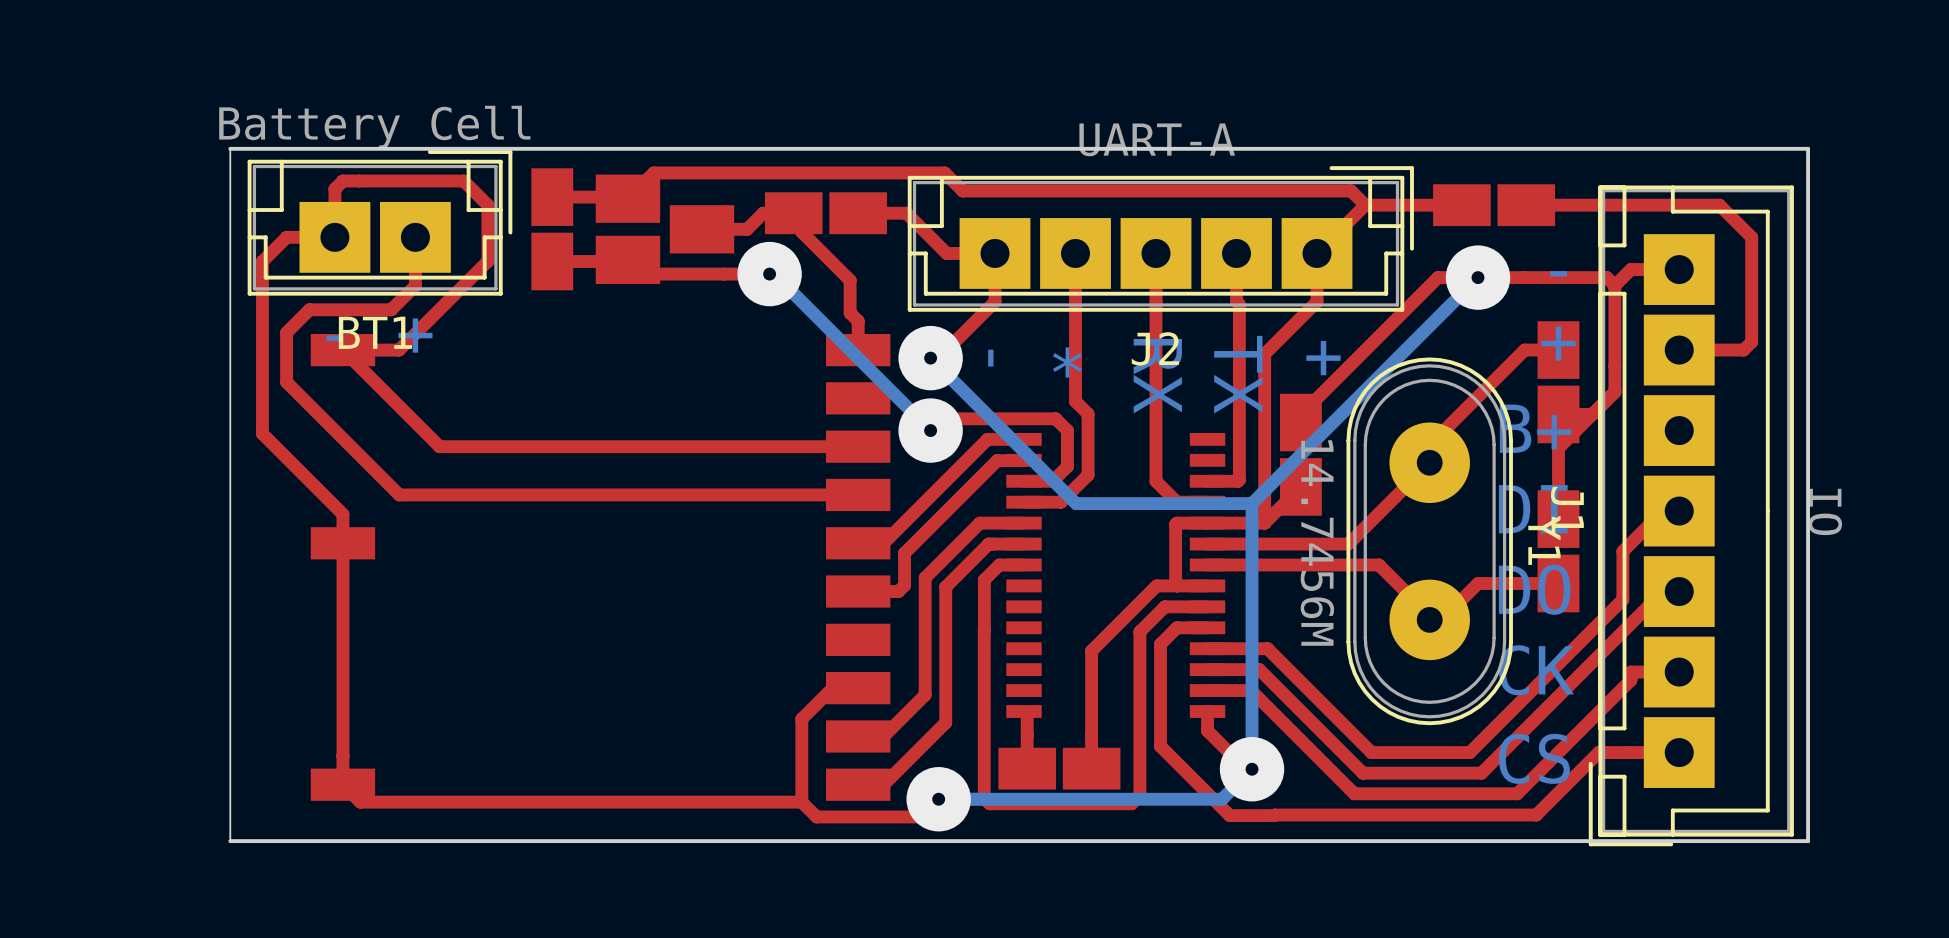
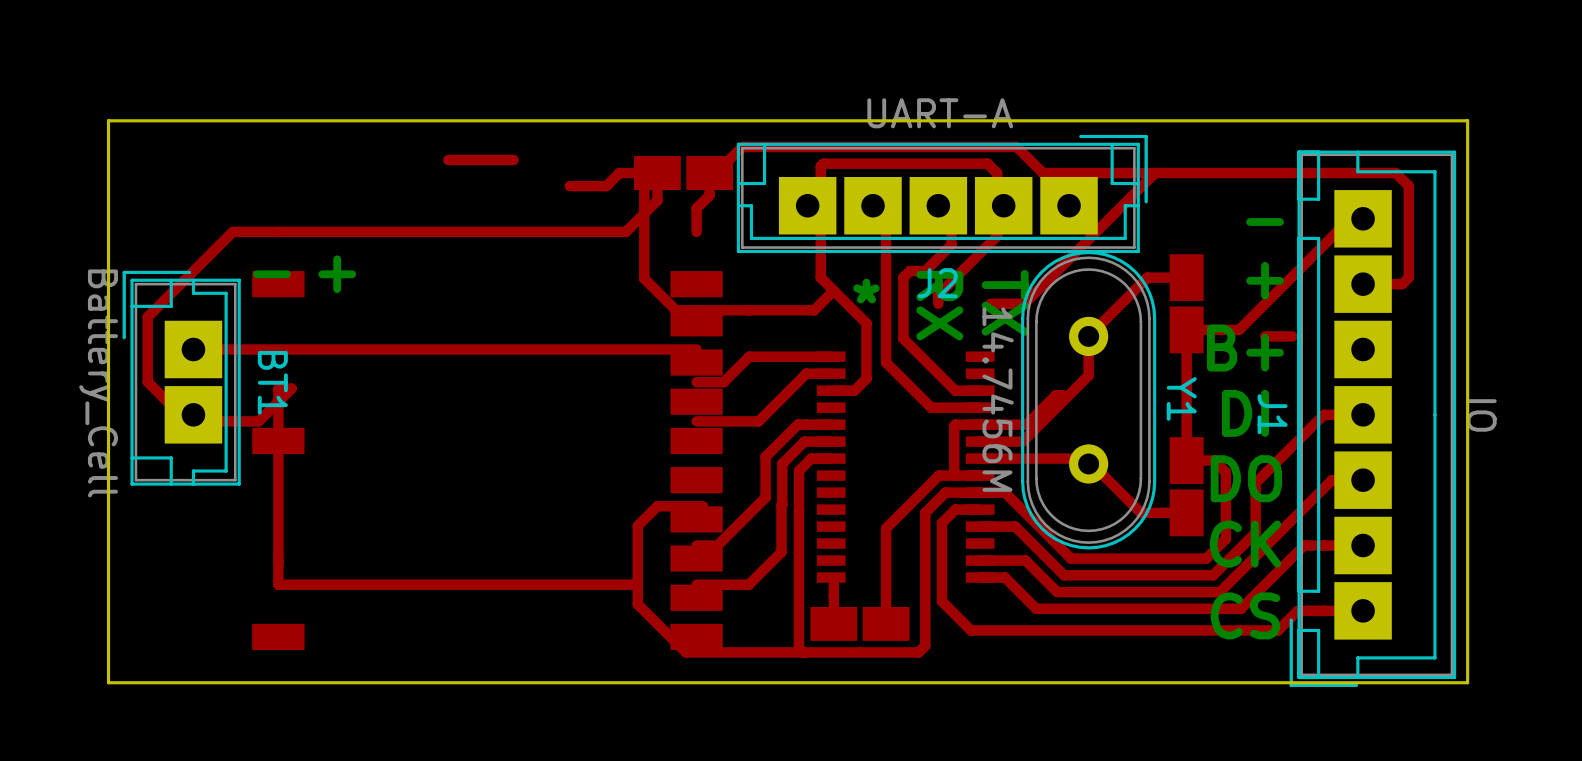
board edge: (230, 148) (230, 841) -> (186, 120) (108, 120) (108, 682) (186, 682)
top track: (627, 198) (653, 172) (944, 172) (962, 190) (1351, 190) (1365, 205) -> none
top track: none -> (709, 166) (709, 195) (696, 208) (696, 231)
top track: (1365, 205) (1317, 253) (1317, 301) (1264, 354) (1264, 523) -> none
top track: (1461, 205) (1365, 205) -> none
part: (1494, 205) -> none
top track: (1526, 205) (1719, 205) (1751, 237) (1751, 342) (1743, 350) (1727, 350) -> (716, 173) (742, 146) (1016, 146) (1042, 173) (1395, 173) (1408, 186) (1408, 277) (1402, 284)
top track: (801, 213) (801, 232) (850, 280) (850, 313) (858, 321) (858, 350) -> none
part position: (825, 213) -> (683, 173)
top track: (850, 213) (906, 213) (946, 253) (995, 253) (995, 301) (938, 358) (930, 358) -> none
top track: none -> (1155, 173) (1024, 303) (990, 303)
BT1 rotation: 0° (380, 222) -> 90° counterclockwise (181, 378)
BT1 position: (380, 222) -> (181, 378)
part: (552, 229) -> none
part: (664, 229) -> none
top track: (415, 237) (415, 285) (391, 309) (309, 309) (286, 332) (286, 382) (399, 494) (858, 494) -> none
top track: (1075, 245) (1075, 401) (1088, 413) (1088, 475) (1060, 502) (1023, 502) -> none
top track: (1156, 253) (1156, 363) -> (866, 349) (866, 323) (820, 277) (820, 166) (823, 163) (987, 163) (997, 173) (997, 236) (938, 294)
top track: (1236, 253) (1236, 301) (1239, 304) (1239, 479) (1207, 481) -> (951, 205) (951, 244) (925, 271) (909, 271) (903, 277) (903, 338) (955, 390) (980, 390)
top track: (552, 261) (632, 261) (645, 274) (769, 274) -> none
top track: (1663, 269) (1630, 269) (1614, 285) -> (1350, 218) (1239, 329) (1186, 329) (1186, 454) (1180, 460) (1214, 460) (1225, 472) (1225, 538) (1206, 558) (1071, 558) (1005, 492) (980, 492)
bottom track: (769, 274) (774, 274) (930, 430) -> none
via: (769, 274) -> none
bottom track: (1478, 277) (1252, 503) -> none
via: (1478, 277) -> none
top track: (1614, 285) (1614, 391) (1558, 448) (1558, 527) -> none
top track: (1614, 285) (1606, 277) (1437, 277) (1300, 414) (1300, 422) -> none
top track: (1558, 350) (1524, 350) (1429, 445) (1429, 462) (1348, 544) (1259, 544) -> (1186, 277) (1147, 277) (1088, 336) (1088, 375) (1022, 441)
Y1 footprint: [1346, 357, 1513, 726] -> [1021, 250, 1157, 550]
bottom track: (930, 358) (1076, 503) (1252, 503) -> none
via: (930, 358) -> none
text: - (990, 358) -> none
top track: none -> (833, 290) (814, 310) (675, 310) (644, 278) (644, 179) (650, 173) (657, 173) (657, 200) (625, 231) (232, 231) (147, 317) (147, 381) (180, 414) (199, 414)
text: + (1323, 358) -> none
top track: (1156, 374) (1156, 481) (1176, 502) -> (886, 205) (886, 362) (931, 407) (955, 407)
part: none -> (1186, 303)
part: (1558, 382) -> none
top track: none -> (696, 349) (193, 349)
via: (930, 430) -> none
top track: (1067, 430) (1055, 418) (942, 418) (930, 430) -> none
top track: (987, 439) (883, 543) (850, 543) -> (801, 356) (749, 356) (723, 382) (696, 382)
top track: (858, 446) (439, 446) (342, 350) (399, 350) (487, 261) (487, 205) (463, 181) (342, 181) (334, 189) (334, 237) (286, 237) (262, 261) (262, 433) (342, 514) -> (193, 421) (258, 421) (291, 388) (278, 388) (278, 417)
part: (1300, 454) -> none
top track: (1023, 460) (997, 460) (904, 553) (904, 585) (898, 591) (858, 591) -> (831, 373) (806, 373) (758, 421) (696, 421)
bottom track: (1252, 503) (1252, 769) (1222, 799) (938, 799) -> none
top track: (1679, 519) (1655, 519) (1622, 551) (1622, 599) (1469, 752) (1371, 752) (1267, 648) (1250, 648) -> (1363, 414) (1323, 414) (1255, 483) (1255, 532) (1213, 575) (1064, 575) (1015, 526)
top track: (982, 523) (979, 523) (925, 577) (925, 694) (883, 736) (858, 736) -> (797, 424) (765, 456) (765, 497) (717, 545) (696, 545)
top track: (991, 544) (988, 544) (945, 586) (945, 722) (883, 784) (858, 784) -> (804, 441) (782, 463) (781, 552) (748, 584) (696, 584)
part: (1558, 551) -> none
top track: (1338, 564) (1378, 564) (1437, 623) (1478, 583) (1558, 583) -> (1086, 458) (1140, 512) (1180, 512)
top track: none -> (1363, 480) (1331, 480) (1220, 592) (1057, 592) (1025, 560) (1015, 560)
part: none -> (1186, 486)
top track: (1679, 599) (1655, 599) (1481, 773) (1362, 773) (1259, 669) (1207, 669) -> none
top track: none -> (703, 506) (657, 506) (637, 525) (637, 604) (685, 652) (803, 652)
top track: (1630, 672) (1630, 680) (1517, 793) (1354, 793) (1251, 690) -> (1323, 545) (1304, 545) (1241, 608) (1036, 608) (1005, 577) (980, 577)
top track: (858, 688) (832, 688) (801, 719) (801, 802) -> none
top track: (1207, 711) (1207, 730) (1245, 769) (1252, 769) -> none
top track: (342, 720) (342, 784) (360, 802) (801, 802) -> (278, 584) (637, 584)
top track: (1160, 740) (1160, 746) (1229, 815) (1536, 815) (1574, 776) -> (942, 601) (971, 630) (1278, 630)
via: (1252, 769) -> none
via: (938, 799) -> none
top track: (985, 799) (938, 799) (920, 816) (816, 816) (801, 802) -> none

